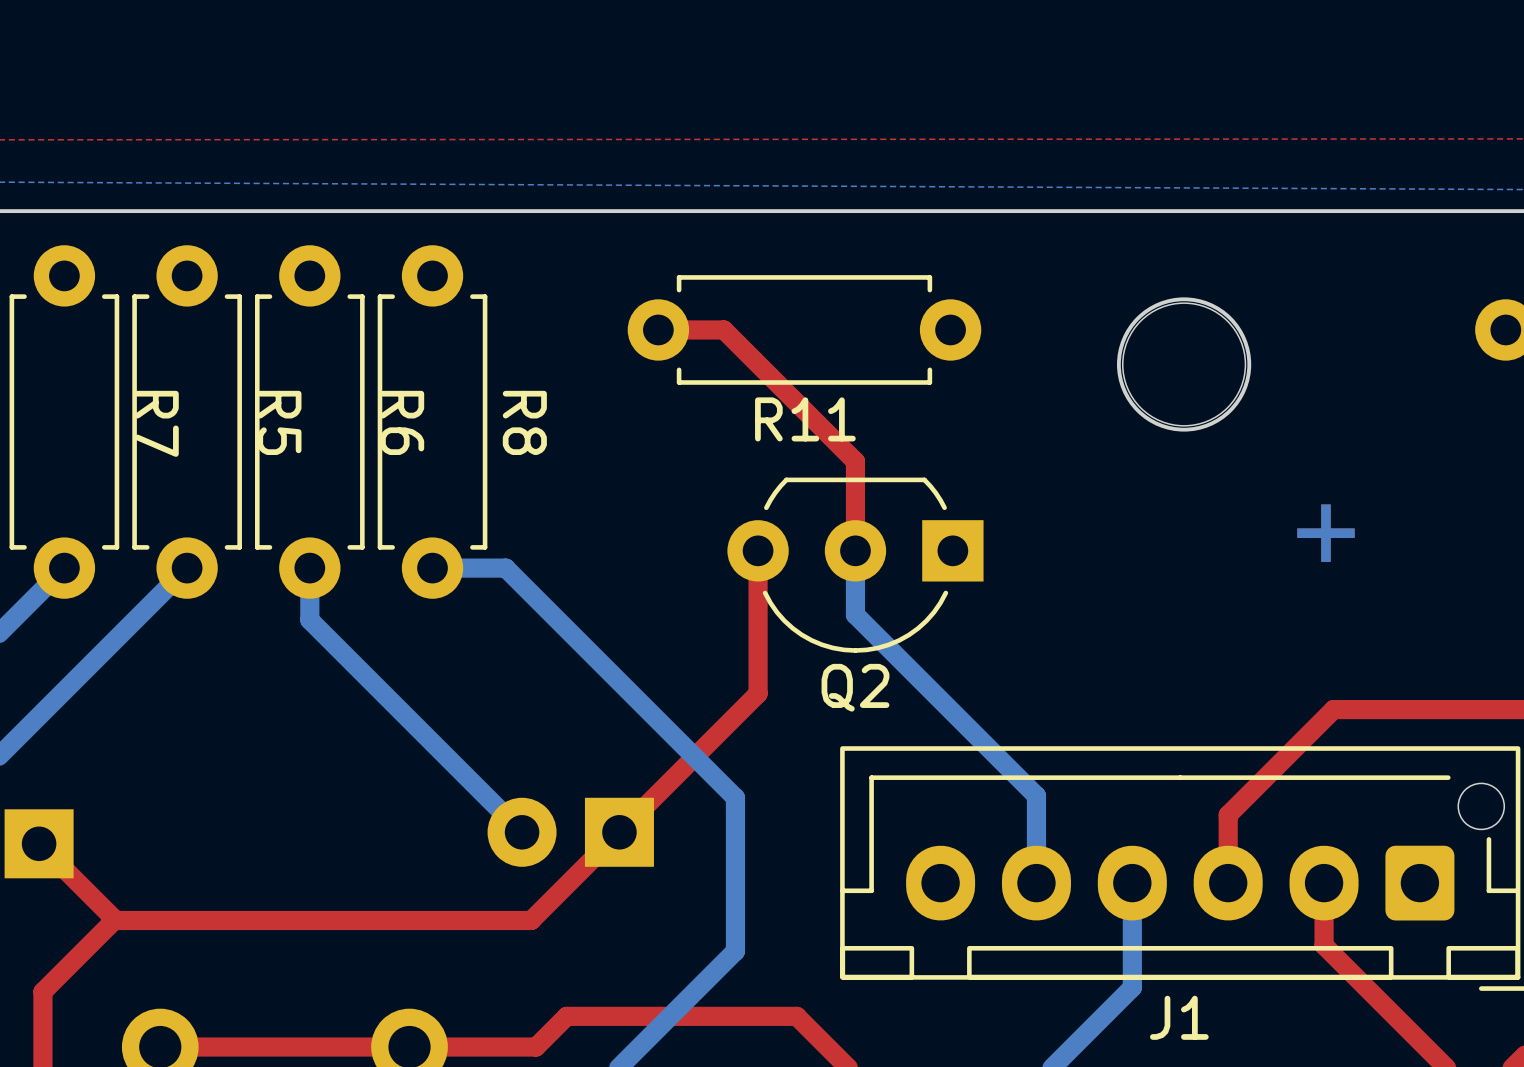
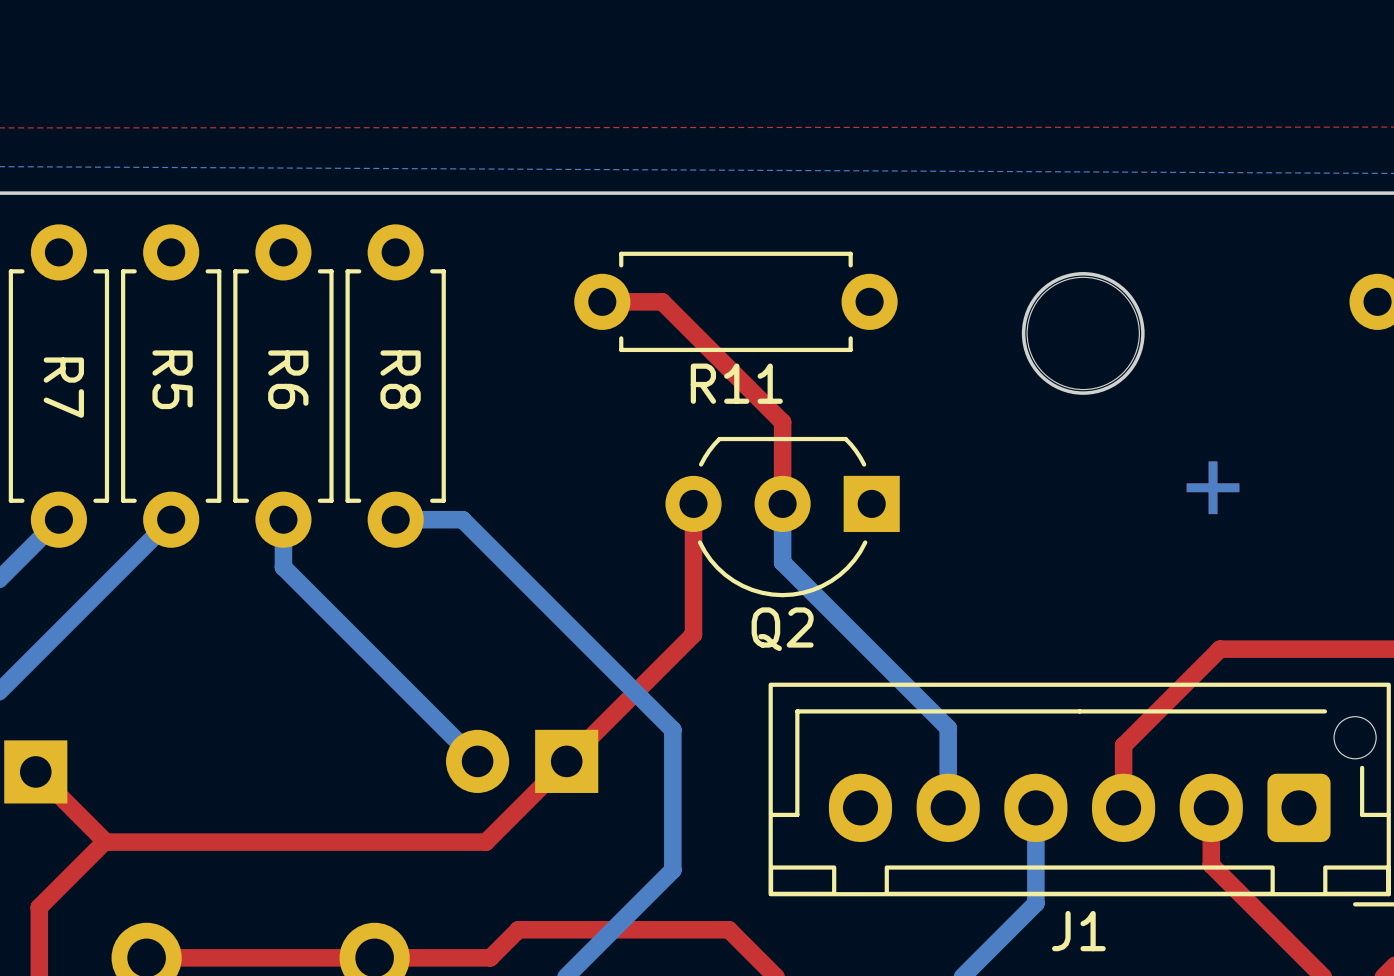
R5 name position: R5 (279, 422) -> R5 (172, 379)
R6 name position: R6 (402, 422) -> R6 (288, 379)
R8 name position: R8 (524, 422) -> R8 (400, 379)
R7 name position: R7 (156, 423) -> R7 (63, 387)

